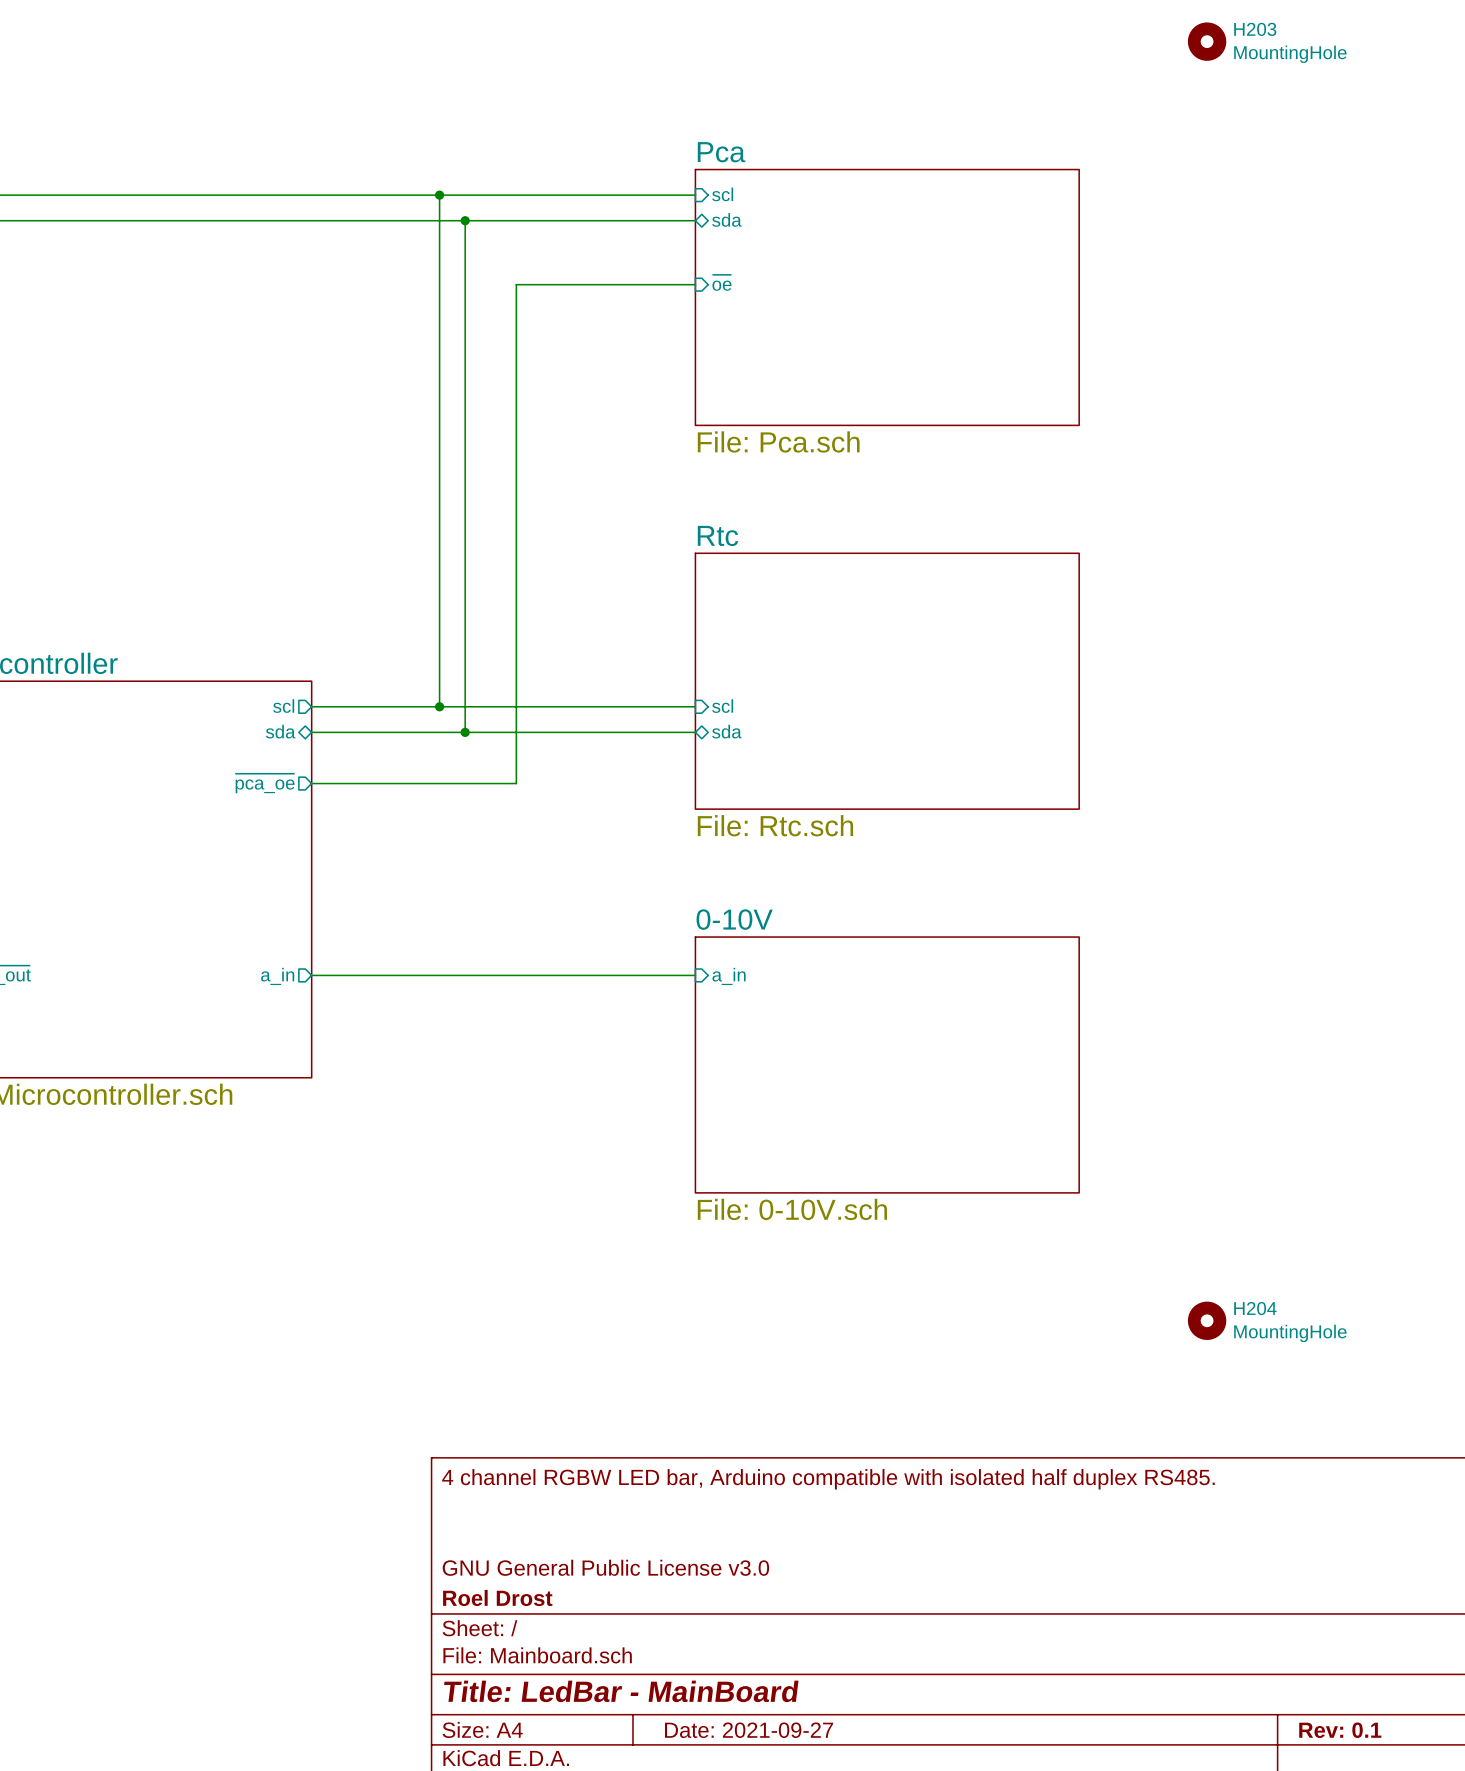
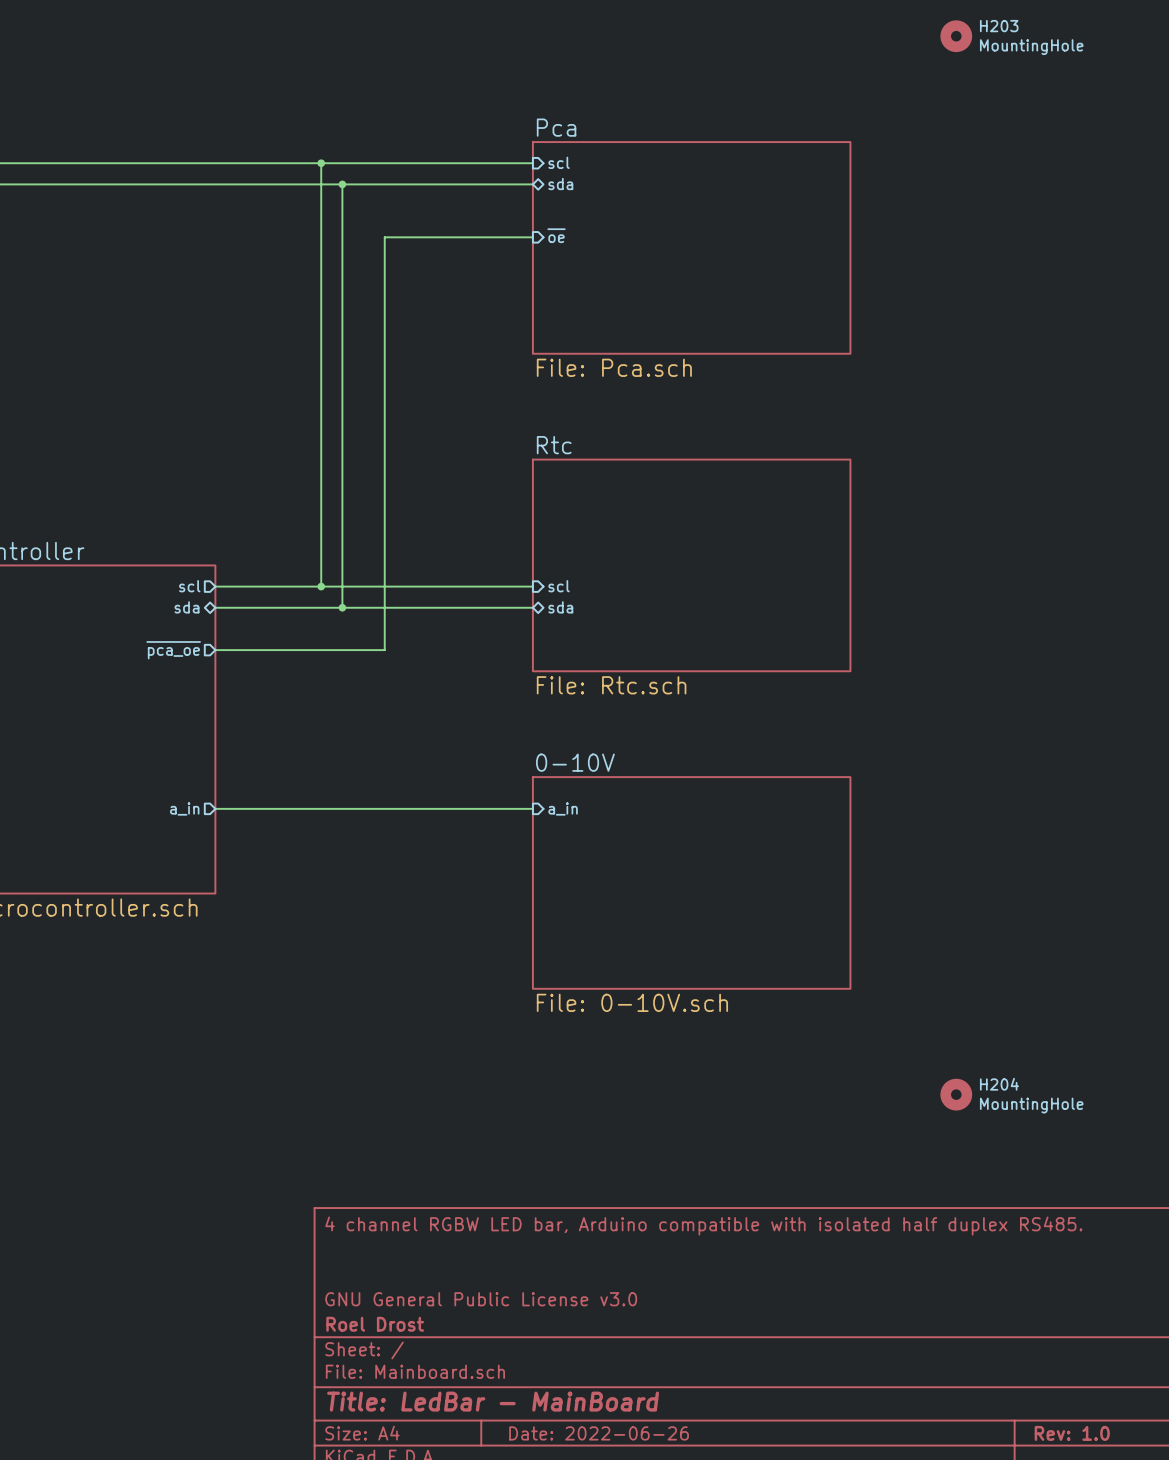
title block: Date: 2021-09-27 (749, 1730) -> Date: 2022-06-26 (599, 1433)
title block: Rev: 0.1 (1340, 1730) -> Rev: 1.0 (1072, 1433)

